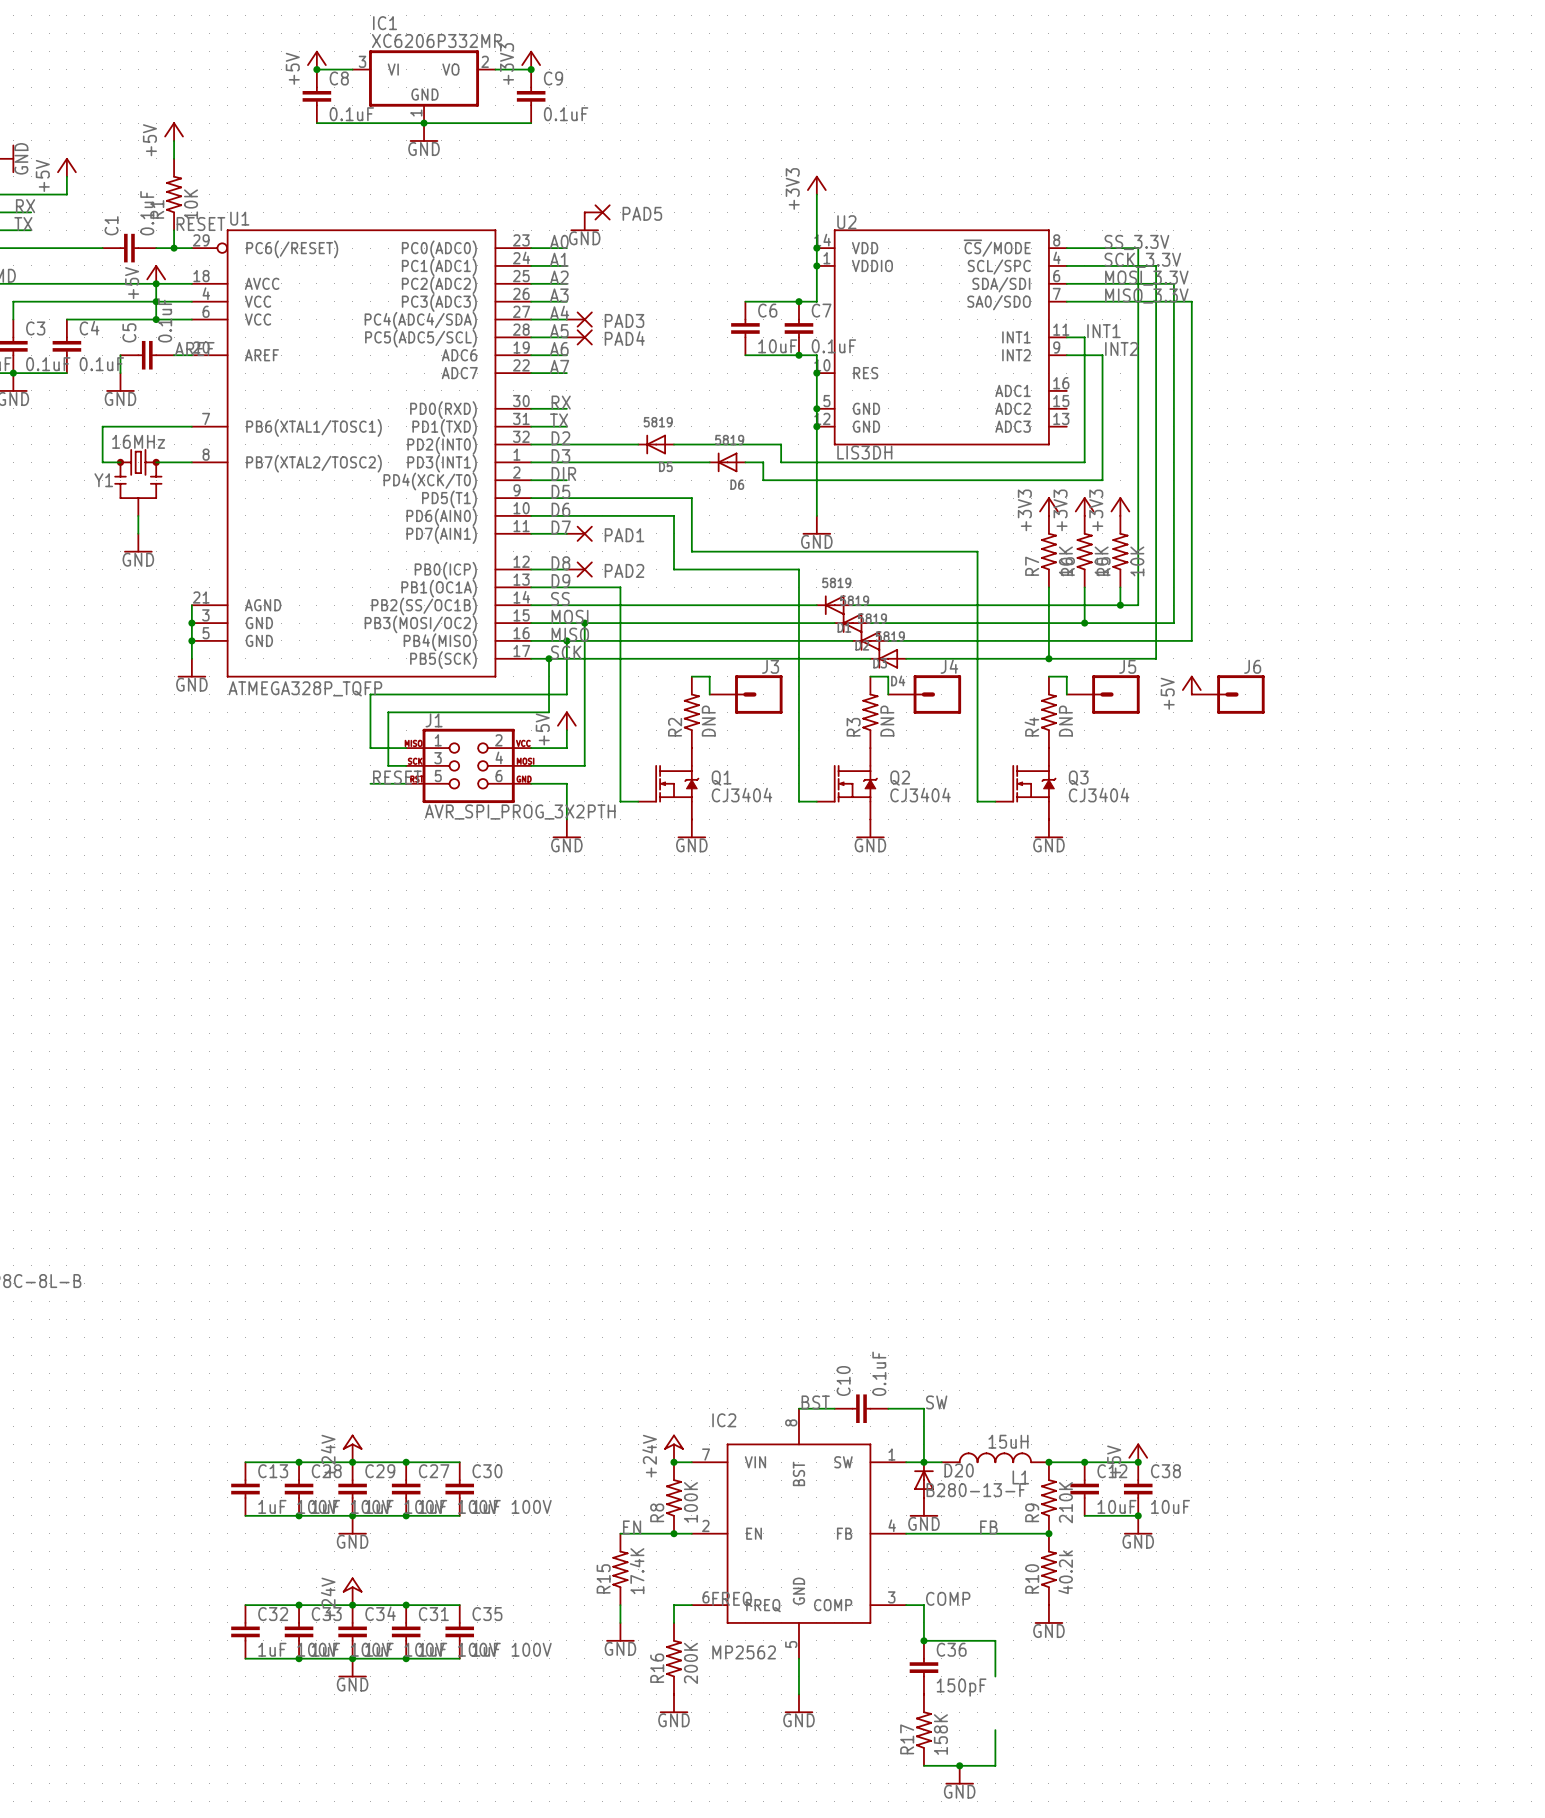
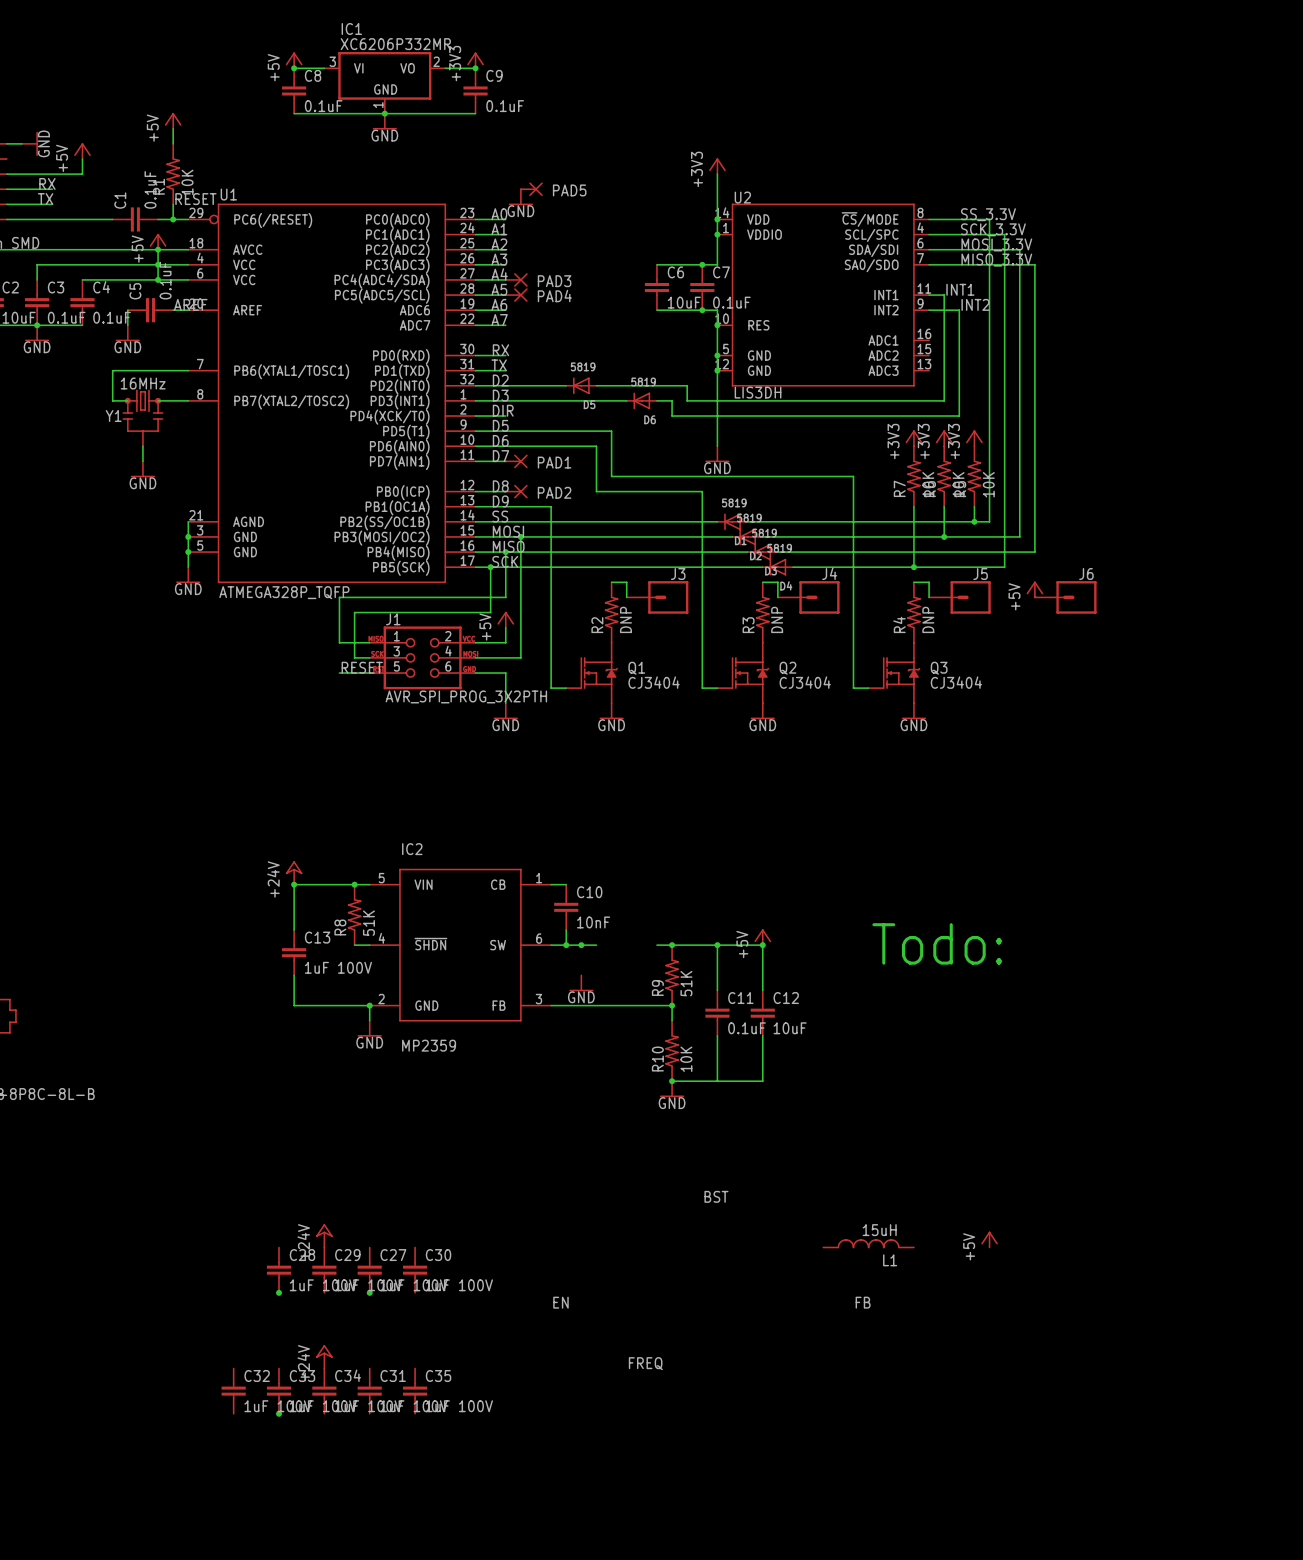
power symbol: none -> +24V (294, 872)
junction: none -> (294, 884)
junction: none -> (354, 884)
wire: none -> (369, 884) (294, 884) (294, 930)
wire: none -> (551, 884) (566, 884)
wire: none -> (566, 930) (566, 945)
power symbol: none -> +5V (762, 937)
text: none -> Todo: (937, 943)
wire: none -> (354, 945) (369, 945)
wire: none -> (551, 945) (596, 945)
junction: none -> (566, 945)
junction: none -> (581, 945)
wire: none -> (656, 945) (762, 945) (762, 990)
junction: none -> (672, 945)
wire: none -> (717, 945) (717, 990)
junction: none -> (717, 945)
junction: none -> (762, 945)
wire: none -> (294, 975) (294, 1005) (369, 1005) (369, 1020)
power symbol: none -> GND (581, 983)
junction: none -> (369, 1005)
wire: none -> (551, 1005) (672, 1005) (672, 1020)
junction: none -> (672, 1005)
C11: none -> 0.1uF (717, 1013)
power symbol: none -> GND (369, 1028)
wire: none -> (717, 1035) (717, 1081)
wire: none -> (762, 1035) (762, 1081) (672, 1081)
junction: none -> (672, 1081)
power symbol: none -> GND (672, 1089)
C10 value: 0.1uF (879, 1373) -> 10nF (593, 922)
label: SW (936, 1402) -> none
IC2 symbol: [691, 1408, 907, 1659] -> [369, 868, 552, 1022]
wire: (798, 1408) (834, 1408) -> none
C10 rotation: 0° (861, 1408) -> 90° clockwise (566, 907)
C10 position: (861, 1408) -> (566, 907)
wire: (888, 1408) (923, 1408) (923, 1462) -> none
IC2 name position: IC2 (724, 1420) -> IC2 (412, 849)
power symbol: +24V (674, 1448) -> none
wire: (245, 1462) (459, 1462) -> none
junction: (299, 1462) -> none
junction: (352, 1462) -> none
junction: (406, 1462) -> none
wire: (674, 1462) (691, 1462) -> none
junction: (674, 1462) -> none
wire: (906, 1462) (941, 1462) -> none
junction: (923, 1462) -> none
wire: (1048, 1462) (1138, 1462) -> none
junction: (1048, 1462) -> none
junction: (1084, 1462) -> none
junction: (1138, 1462) -> none
D20: B280-13-F (923, 1480) -> none
C13 position: (245, 1489) -> (294, 952)
C12 position: (1084, 1489) -> (762, 1013)
C38: 10uF (1138, 1489) -> none
R8 position: (674, 1497) -> (354, 914)
R9 position: (1048, 1497) -> (672, 975)
R8 value: 100K (690, 1502) -> 51K (368, 923)
R9 value: 210K (1065, 1502) -> 51K (686, 983)
power symbol: GND (923, 1507) -> none
wire: (245, 1515) (459, 1515) -> none
junction: (352, 1515) -> none
wire: (1084, 1515) (1138, 1515) -> none
junction: (1138, 1515) -> none
power symbol: GND (352, 1525) -> none
power symbol: GND (1138, 1525) -> none
wire: (620, 1533) (691, 1533) -> none
junction: (674, 1533) -> none
wire: (906, 1533) (1048, 1533) -> none
junction: (1048, 1533) -> none
R15: 17.4K (620, 1569) -> none
R10 position: (1048, 1569) -> (672, 1050)
R10 value: 40.2k (1065, 1572) -> 10K (686, 1059)
label: COMP (948, 1598) -> none
wire: (245, 1605) (459, 1605) -> none
junction: (299, 1605) -> none
junction: (352, 1605) -> none
junction: (406, 1605) -> none
wire: (620, 1605) (620, 1622) -> none
wire: (691, 1605) (674, 1605) (674, 1622) -> none
wire: (906, 1605) (923, 1605) (923, 1640) (995, 1640) (995, 1676) -> none
power symbol: GND (1048, 1614) -> none
power symbol: GND (620, 1632) -> none
junction: (923, 1640) -> none
IC2 value: MP2562 (744, 1652) -> MP2359 (429, 1045)
wire: (245, 1658) (459, 1658) -> none
junction: (352, 1658) -> none
junction: (406, 1658) -> none
R16: 200K (674, 1658) -> none
wire: (798, 1658) (798, 1694) -> none
C36: 150pF (923, 1667) -> none
power symbol: GND (352, 1668) -> none
power symbol: GND (674, 1703) -> none
power symbol: GND (798, 1703) -> none
R17: 158K (923, 1730) -> none
wire: (995, 1730) (995, 1765) (923, 1765) -> none
junction: (959, 1765) -> none
power symbol: GND (959, 1775) -> none

